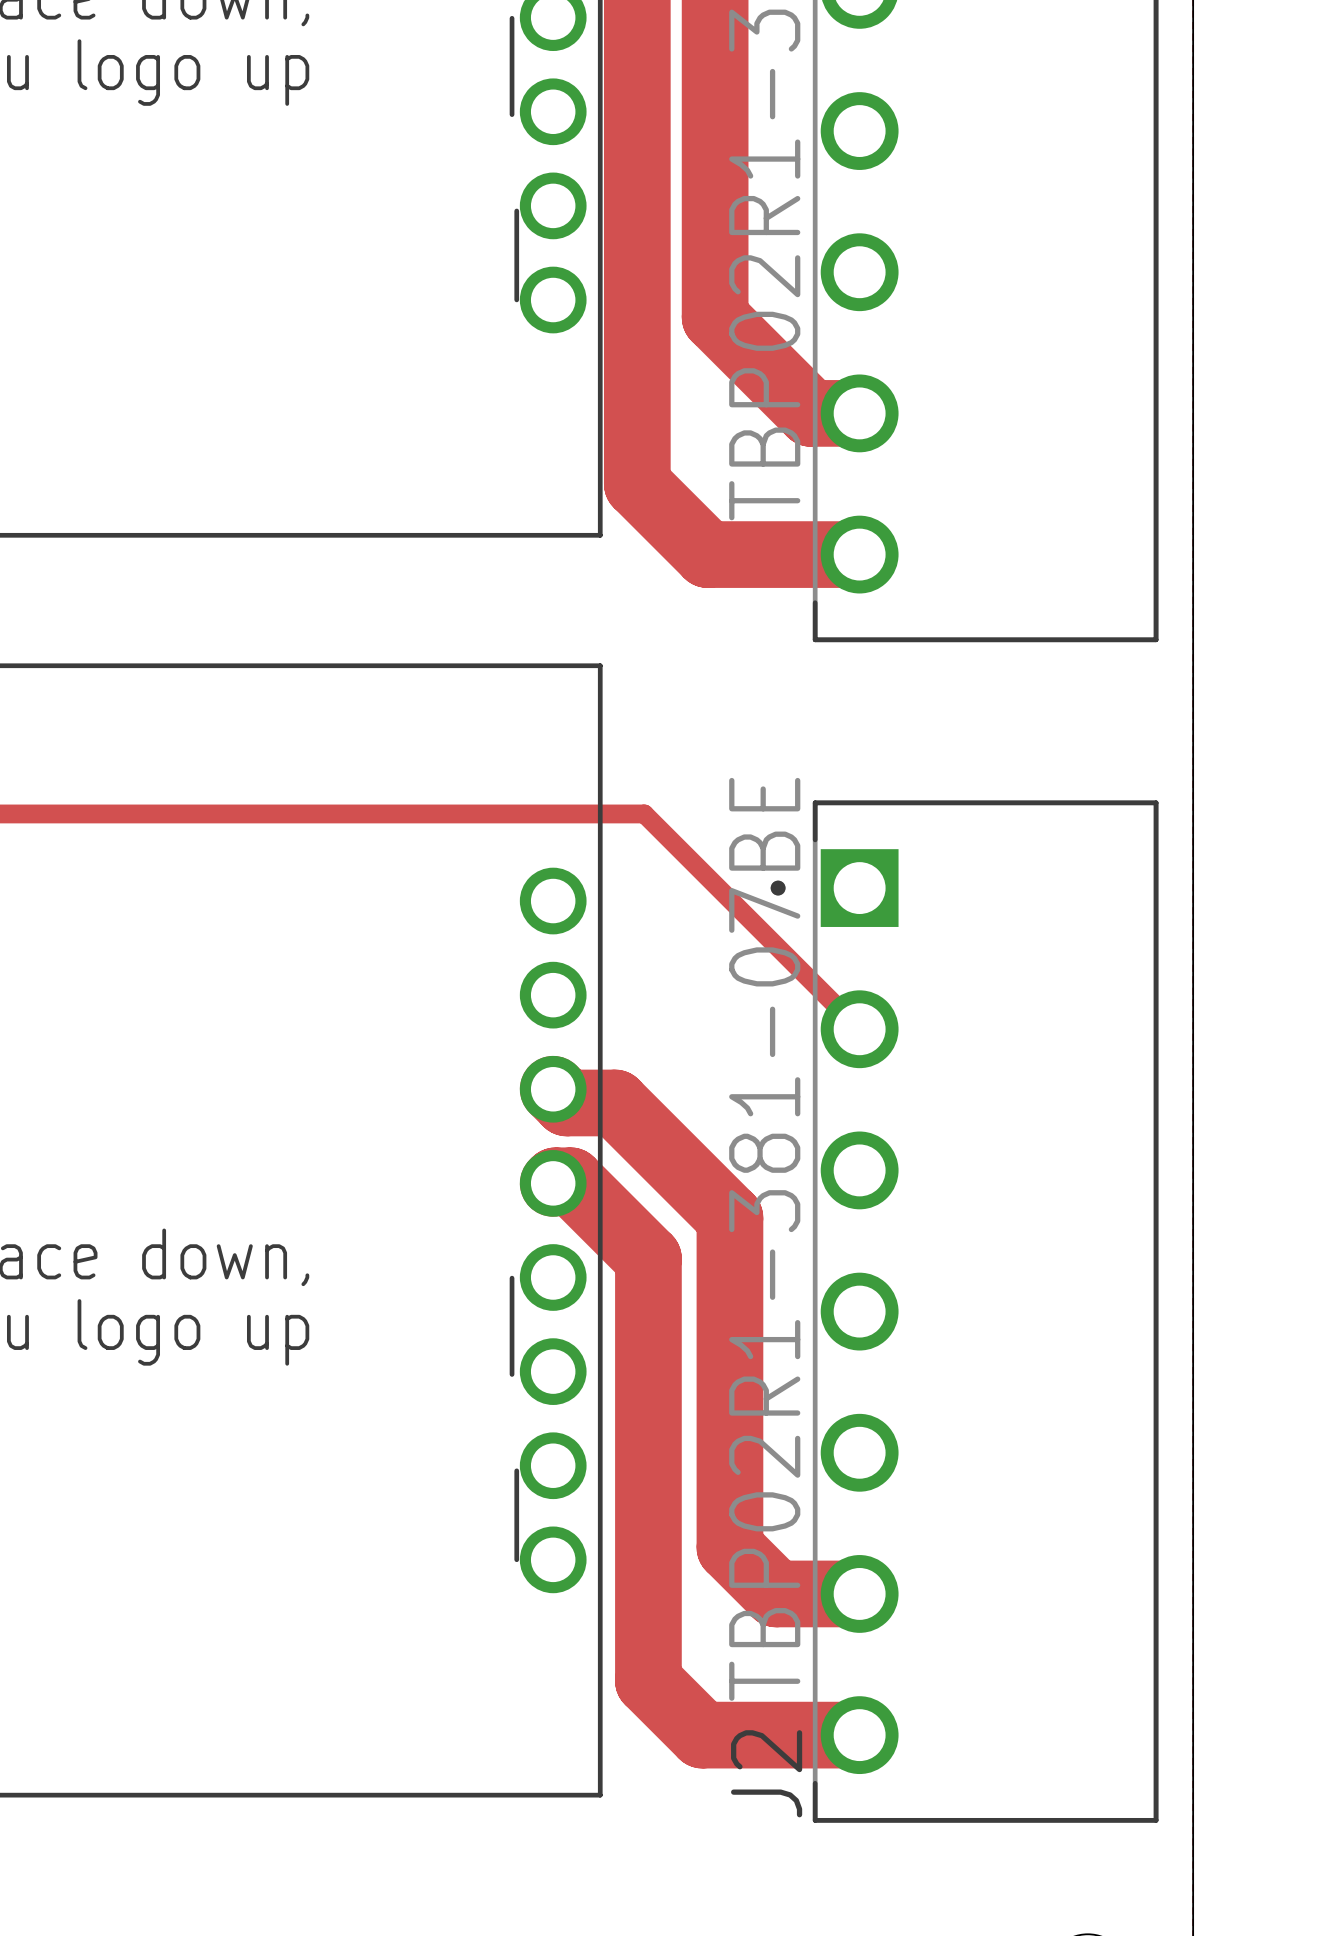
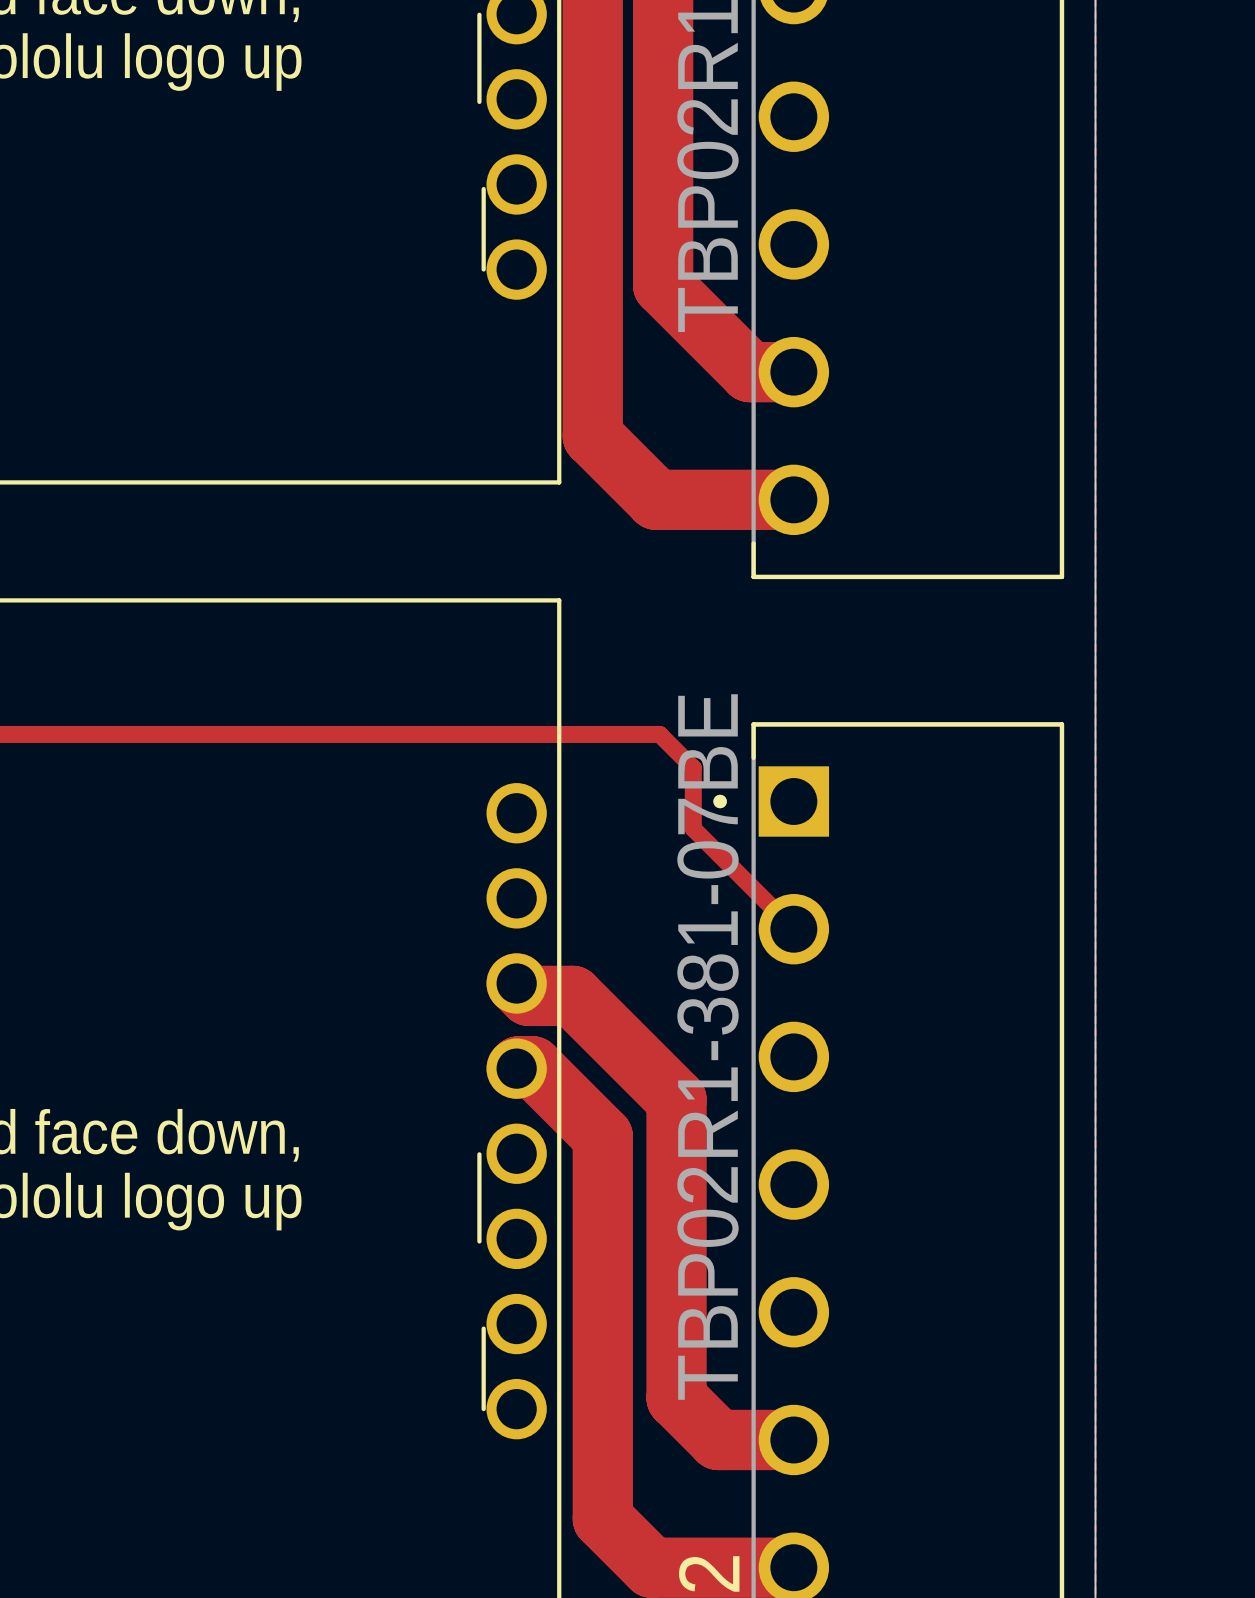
track: (644, 813) (748, 918) -> (599, 734) (659, 734) (693, 767) (693, 828)

